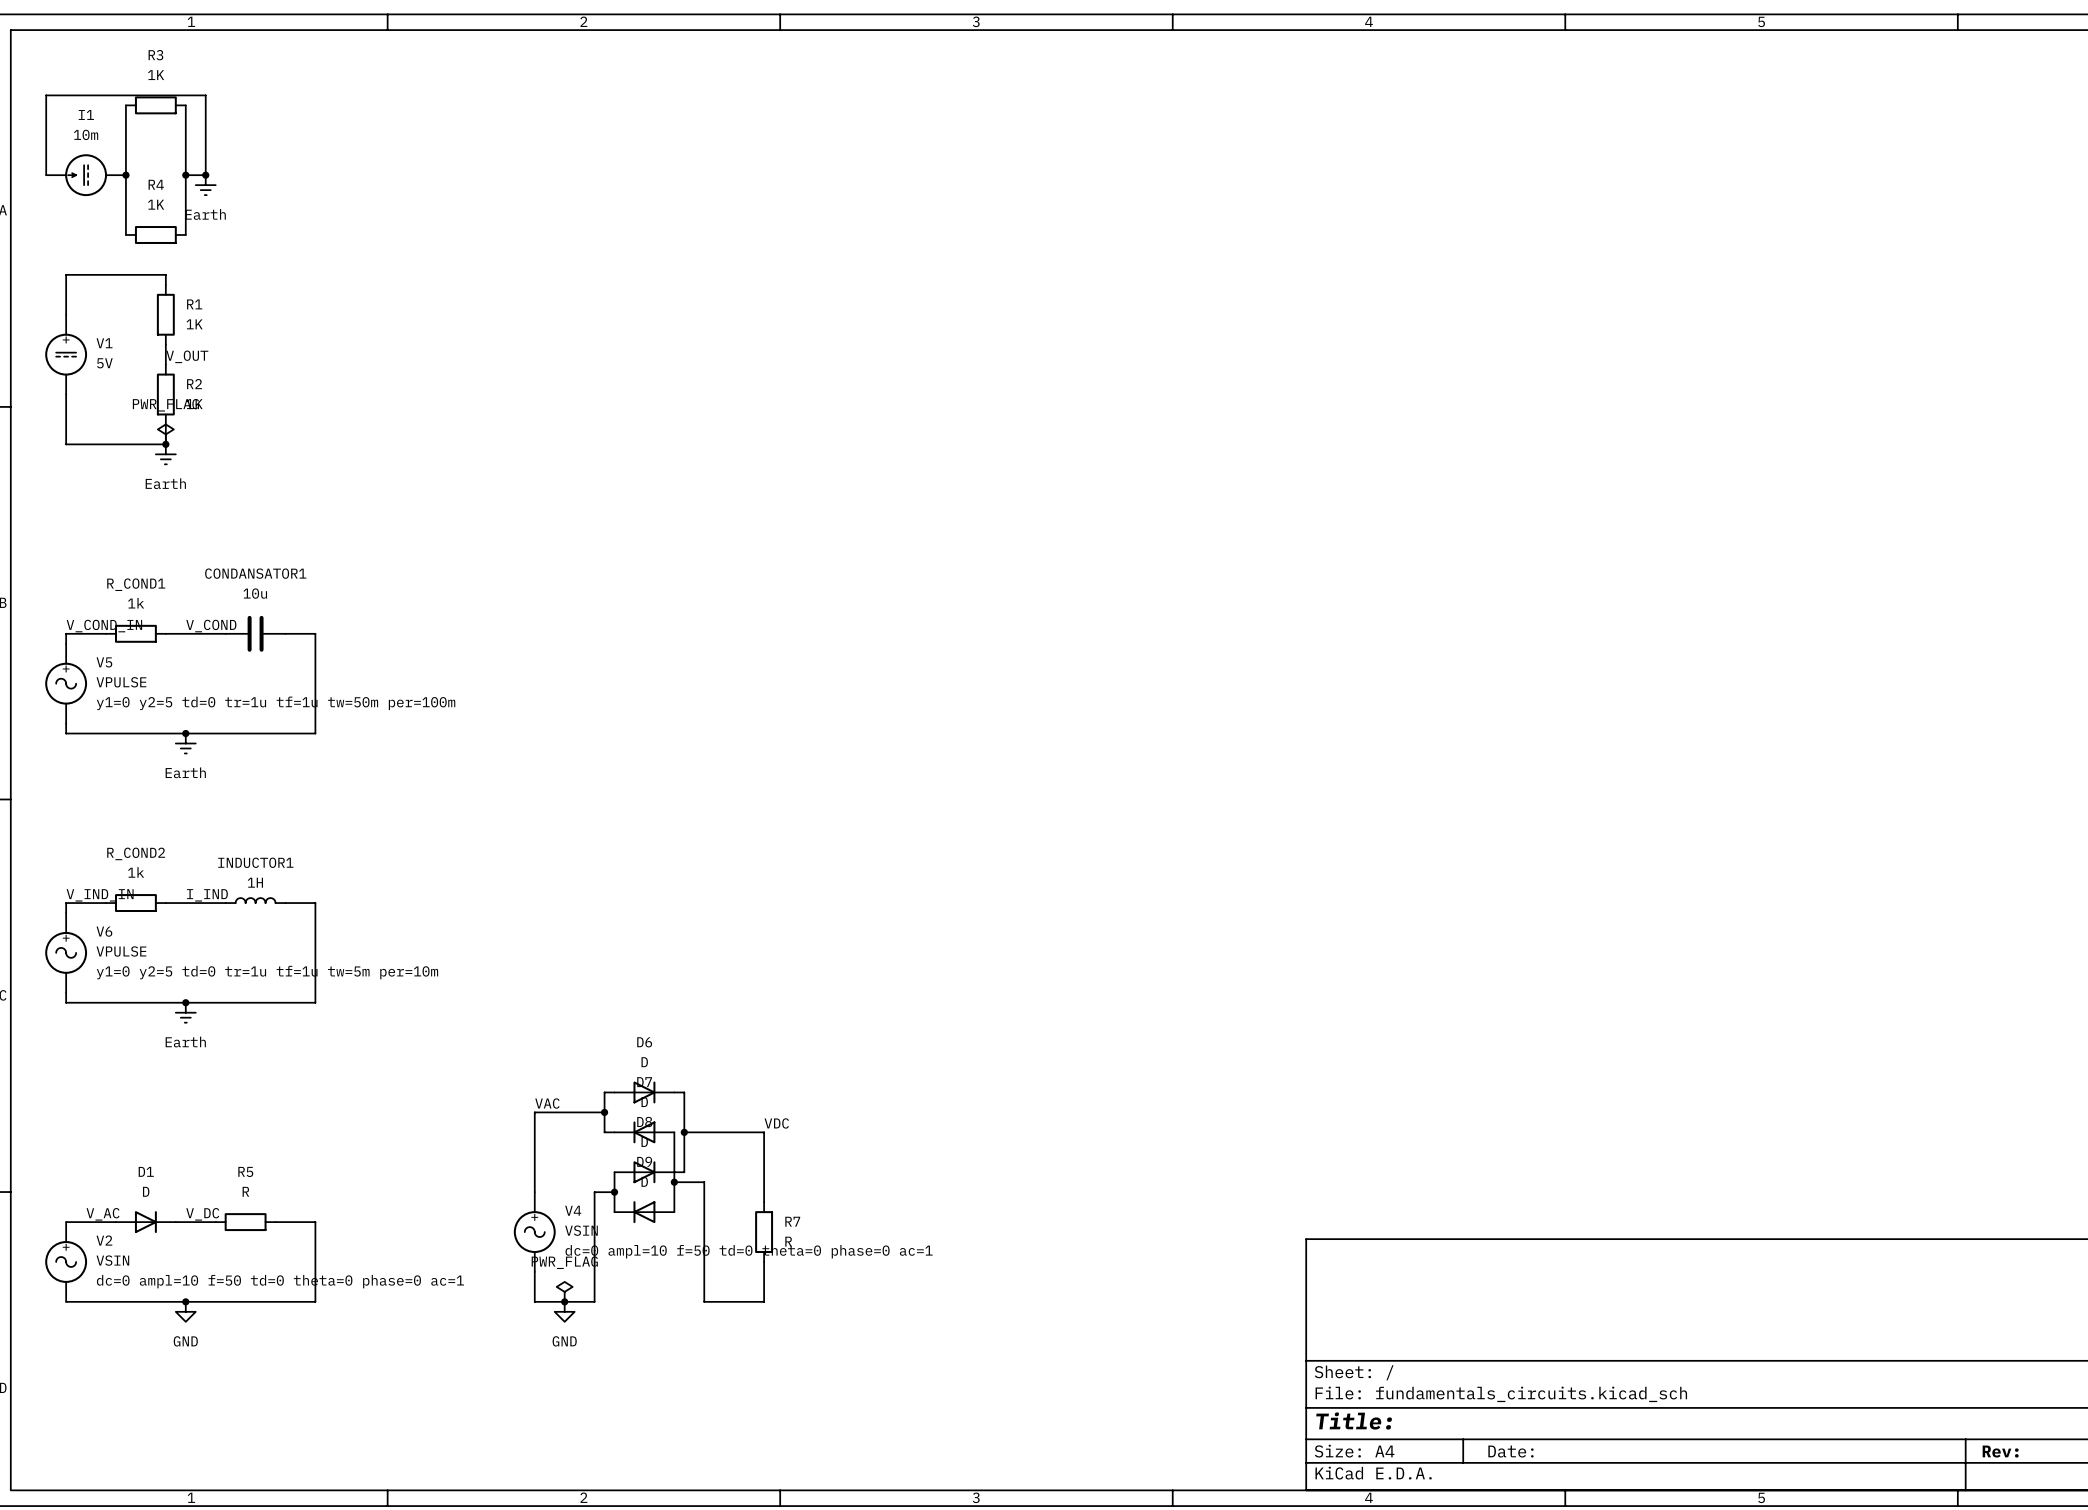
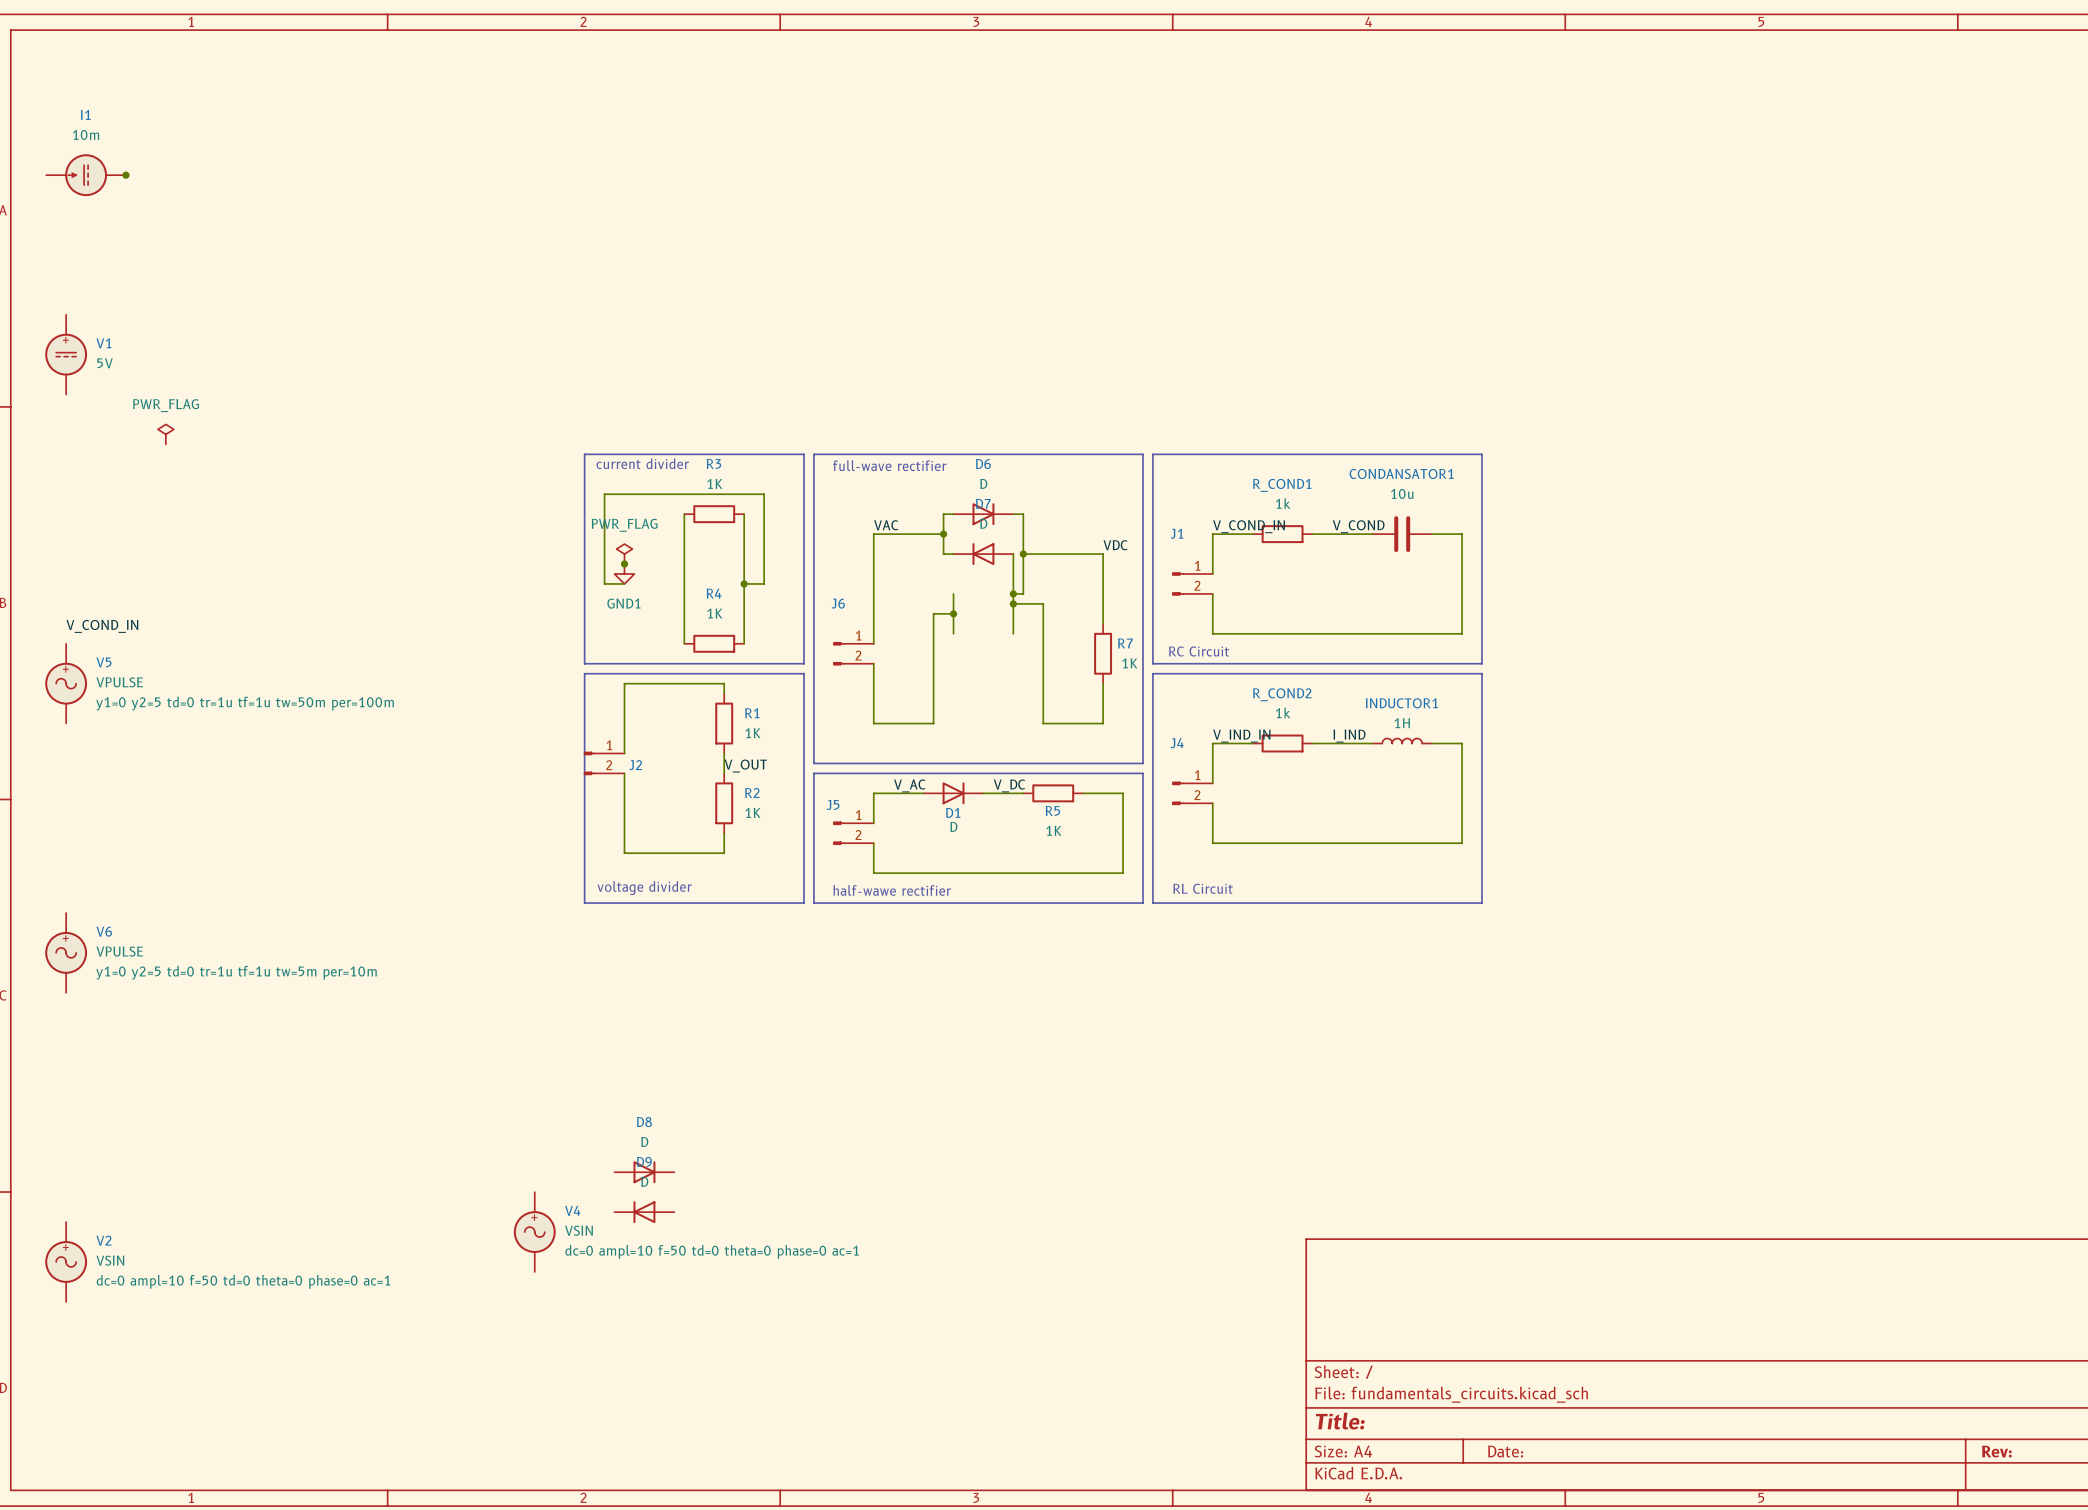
wire: (125, 105) (125, 234) -> none
R3 position: (155, 105) -> (714, 514)
wire: (185, 105) (185, 234) -> none
wire: (46, 175) (46, 95) (205, 95) (205, 175) (185, 175) -> none
junction: (185, 175) -> none
junction: (205, 175) -> none
power symbol: Earth (205, 185) -> none
R4 position: (155, 234) -> (714, 643)
wire: (165, 284) (165, 274) (66, 274) (66, 314) -> none
R1 position: (165, 314) -> (724, 723)
wire: (165, 344) (165, 364) -> none
label: V_OUT (187, 356) -> none
wire: (66, 394) (66, 444) (165, 444) (165, 424) -> none
R2 position: (165, 394) -> (724, 803)
junction: (165, 444) -> none
power symbol: Earth (165, 454) -> none
line: none -> (584, 454) (803, 454) (803, 663) (584, 663) (584, 454)
line: none -> (813, 454) (1142, 454) (1142, 763) (813, 763) (813, 454)
line: none -> (1152, 454) (1481, 454) (1481, 663) (1152, 663) (1152, 454)
text: none -> current divider (642, 463)
text: none -> full-wave rectifier (889, 465)
wire: none -> (684, 514) (684, 643)
wire: none -> (744, 514) (744, 643)
wire: none -> (953, 514) (943, 514) (943, 554) (953, 554)
wire: none -> (1013, 514) (1023, 514) (1023, 593) (1013, 593)
label: none -> VAC (886, 525)
label: none -> V_COND_IN (1249, 526)
label: none -> V_COND (1358, 526)
wire: none -> (943, 534) (873, 534) (873, 643)
junction: none -> (943, 534)
wire: none -> (1252, 534) (1212, 534) (1212, 574)
wire: none -> (1312, 534) (1372, 534)
wire: none -> (1432, 534) (1462, 534) (1462, 633) (1212, 633) (1212, 593)
label: none -> VDC (1115, 545)
power symbol: none -> PWR_FLAG (624, 554)
wire: none -> (1013, 554) (1013, 633)
wire: none -> (1023, 554) (1103, 554) (1103, 623)
junction: none -> (1023, 554)
junction: none -> (624, 564)
power symbol: none -> GND1 (624, 574)
wire: none -> (624, 583) (604, 583) (604, 494) (764, 494) (764, 583) (744, 583)
junction: none -> (744, 583)
J1: none -> (1192, 583)
wire: none -> (953, 593) (953, 633)
junction: none -> (1013, 593)
wire: none -> (1013, 603) (1043, 603) (1043, 723) (1103, 723) (1103, 683)
junction: none -> (1013, 603)
wire: none -> (953, 613) (933, 613) (933, 723) (873, 723) (873, 663)
junction: none -> (953, 613)
label: V_COND (211, 626) -> none
wire: (106, 633) (66, 633) (66, 643) -> none
R_COND1 position: (135, 633) -> (1282, 534)
wire: (165, 633) (225, 633) -> none
CONDANSATOR1 position: (255, 633) -> (1402, 534)
wire: (285, 633) (315, 633) (315, 733) (66, 733) (66, 723) -> none
text: none -> RC Circuit (1199, 651)
J6: none -> (853, 653)
line: none -> (584, 673) (803, 673) (803, 903) (584, 903) (584, 673)
line: none -> (1152, 673) (1481, 673) (1481, 903) (1152, 903) (1152, 673)
wire: none -> (724, 693) (724, 683) (624, 683) (624, 753)
junction: (185, 733) -> none
label: none -> V_IND_IN (1241, 736)
label: none -> I_IND (1349, 736)
power symbol: Earth (185, 743) -> none
wire: none -> (1252, 743) (1212, 743) (1212, 783)
wire: none -> (1312, 743) (1372, 743)
wire: none -> (1432, 743) (1462, 743) (1462, 843) (1212, 843) (1212, 803)
wire: none -> (724, 753) (724, 773)
J2: none -> (604, 763)
label: none -> V_OUT (745, 766)
wire: none -> (624, 773) (624, 853) (724, 853) (724, 833)
line: none -> (813, 773) (813, 903) (1142, 903) (1142, 773) (813, 773)
label: none -> V_AC (909, 785)
label: none -> V_DC (1009, 785)
wire: none -> (923, 793) (873, 793) (873, 823)
wire: none -> (983, 793) (1023, 793)
wire: none -> (1083, 793) (1123, 793) (1123, 873) (873, 873) (873, 843)
J4: none -> (1192, 793)
J5: none -> (853, 833)
text: none -> voltage divider (644, 888)
text: none -> RL Circuit (1203, 888)
text: none -> half-wawe rectifier (892, 890)
label: V_IND_IN (100, 895) -> none
label: I_IND (207, 895) -> none
INDUCTOR1 position: (255, 900) -> (1402, 741)
wire: (106, 903) (66, 903) (66, 913) -> none
R_COND2 position: (135, 903) -> (1282, 743)
wire: (165, 903) (225, 903) -> none
wire: (285, 903) (315, 903) (315, 1002) (66, 1002) (66, 992) -> none
junction: (185, 1002) -> none
power symbol: Earth (185, 1012) -> none
wire: (614, 1092) (604, 1092) (604, 1132) (614, 1132) -> none
D6 position: (644, 1092) -> (983, 514)
wire: (674, 1092) (684, 1092) (684, 1172) (674, 1172) -> none
label: VAC (547, 1103) -> none
wire: (604, 1112) (534, 1112) (534, 1192) -> none
junction: (604, 1112) -> none
label: VDC (776, 1123) -> none
D7 position: (644, 1132) -> (983, 554)
wire: (674, 1132) (674, 1212) -> none
wire: (684, 1132) (764, 1132) (764, 1202) -> none
junction: (684, 1132) -> none
D1 name position: D1 (146, 1171) -> D1 (953, 812)
R5 name position: R5 (245, 1171) -> R5 (1052, 810)
wire: (614, 1172) (614, 1212) -> none
wire: (674, 1182) (704, 1182) (704, 1301) (764, 1301) (764, 1261) -> none
junction: (674, 1182) -> none
D1 value position: D (146, 1191) -> D (953, 826)
R5 value: R (245, 1191) -> 1K (1053, 830)
wire: (614, 1192) (594, 1192) (594, 1301) (534, 1301) (534, 1271) -> none
junction: (614, 1192) -> none
label: V_AC (103, 1214) -> none
label: V_DC (202, 1214) -> none
R7 name position: R7 (792, 1221) -> R7 (1125, 643)
wire: (66, 1222) (115, 1222) -> none
D1 position: (145, 1222) -> (953, 793)
wire: (175, 1222) (215, 1222) -> none
R5 position: (245, 1222) -> (1053, 793)
wire: (275, 1222) (315, 1222) (315, 1301) (66, 1301) -> none
R7 position: (764, 1232) -> (1103, 653)
R7 value: R (788, 1241) -> 1K (1129, 663)
power symbol: PWR_FLAG (564, 1291) -> none
junction: (185, 1301) -> none
junction: (564, 1301) -> none
power symbol: GND (185, 1311) -> none
power symbol: GND (564, 1311) -> none

